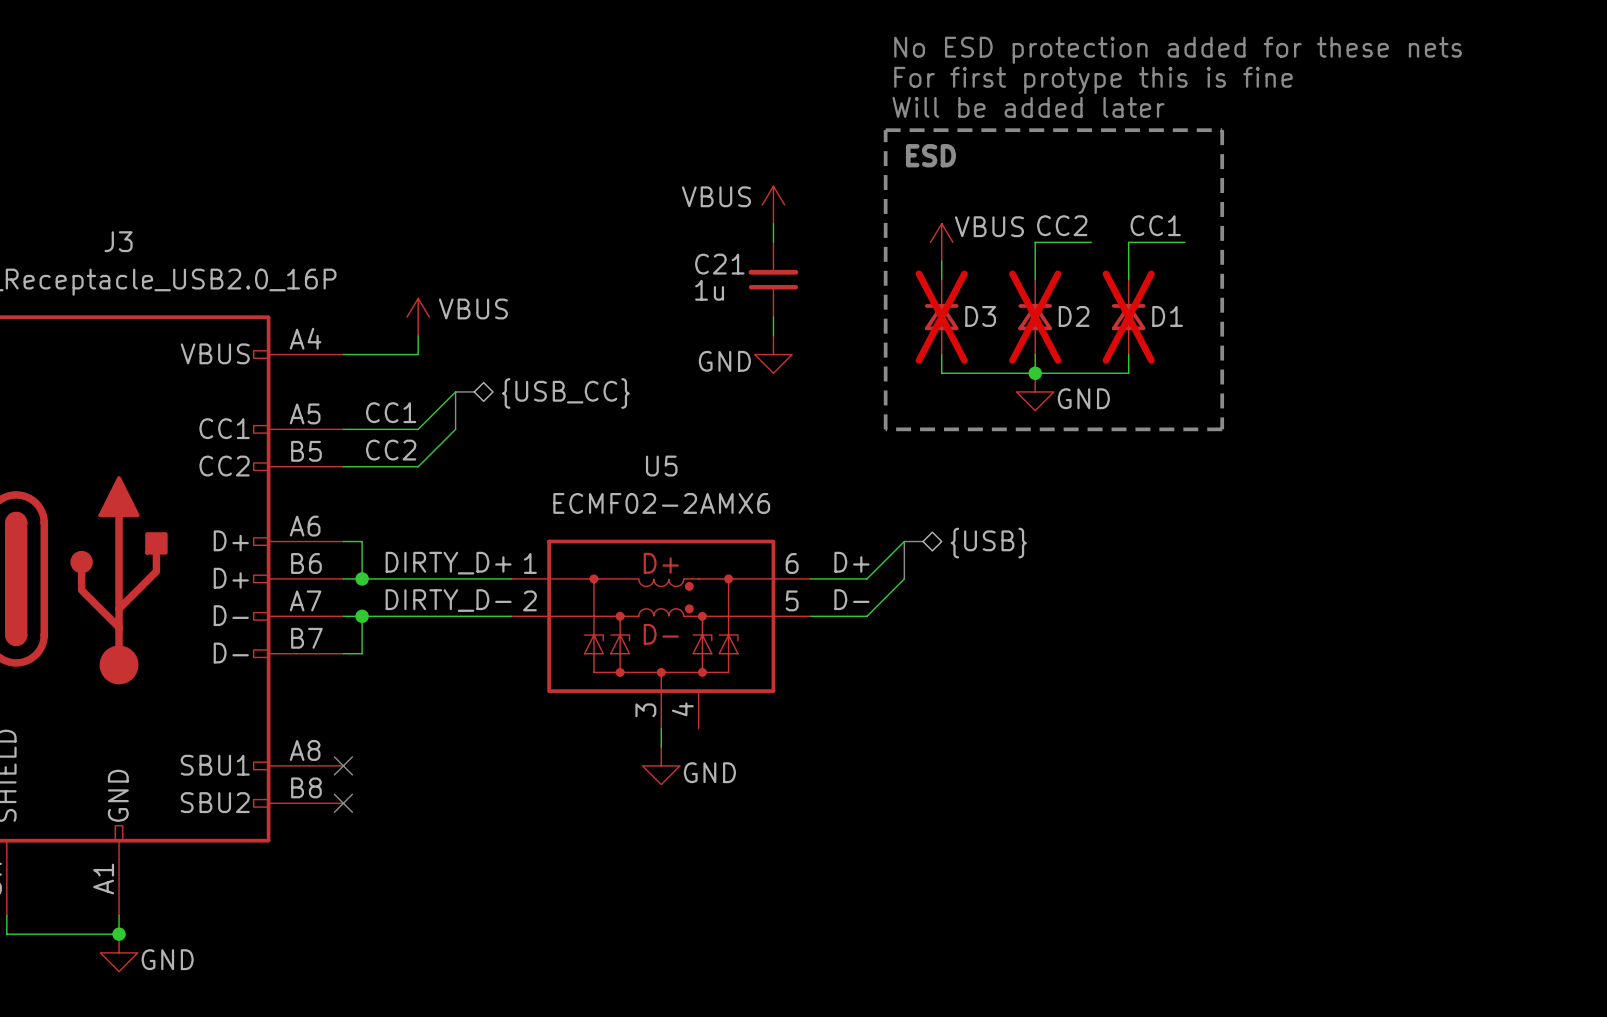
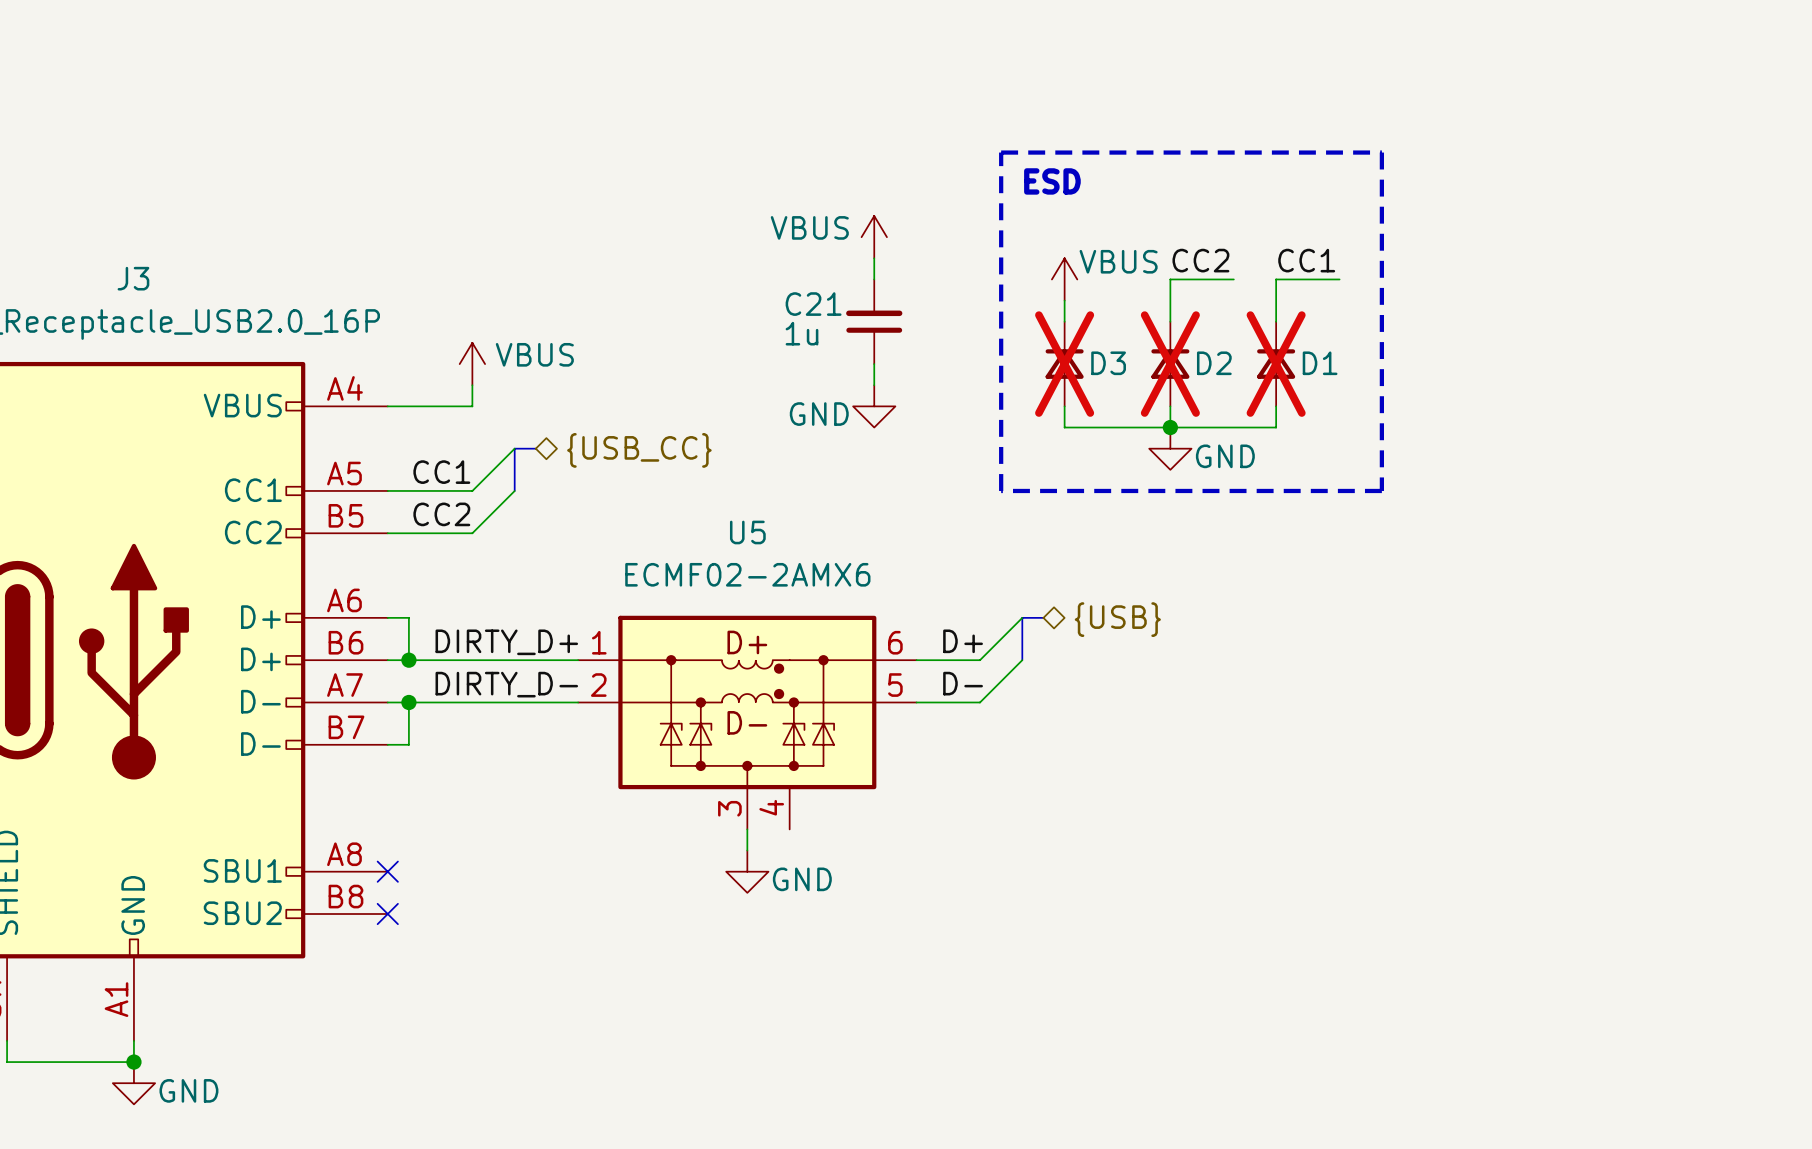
text: No ESD protection added for these nets (1178, 50) -> none
text: For first protype this is fine (1093, 80) -> none
text: Will be added later (1028, 107) -> none

